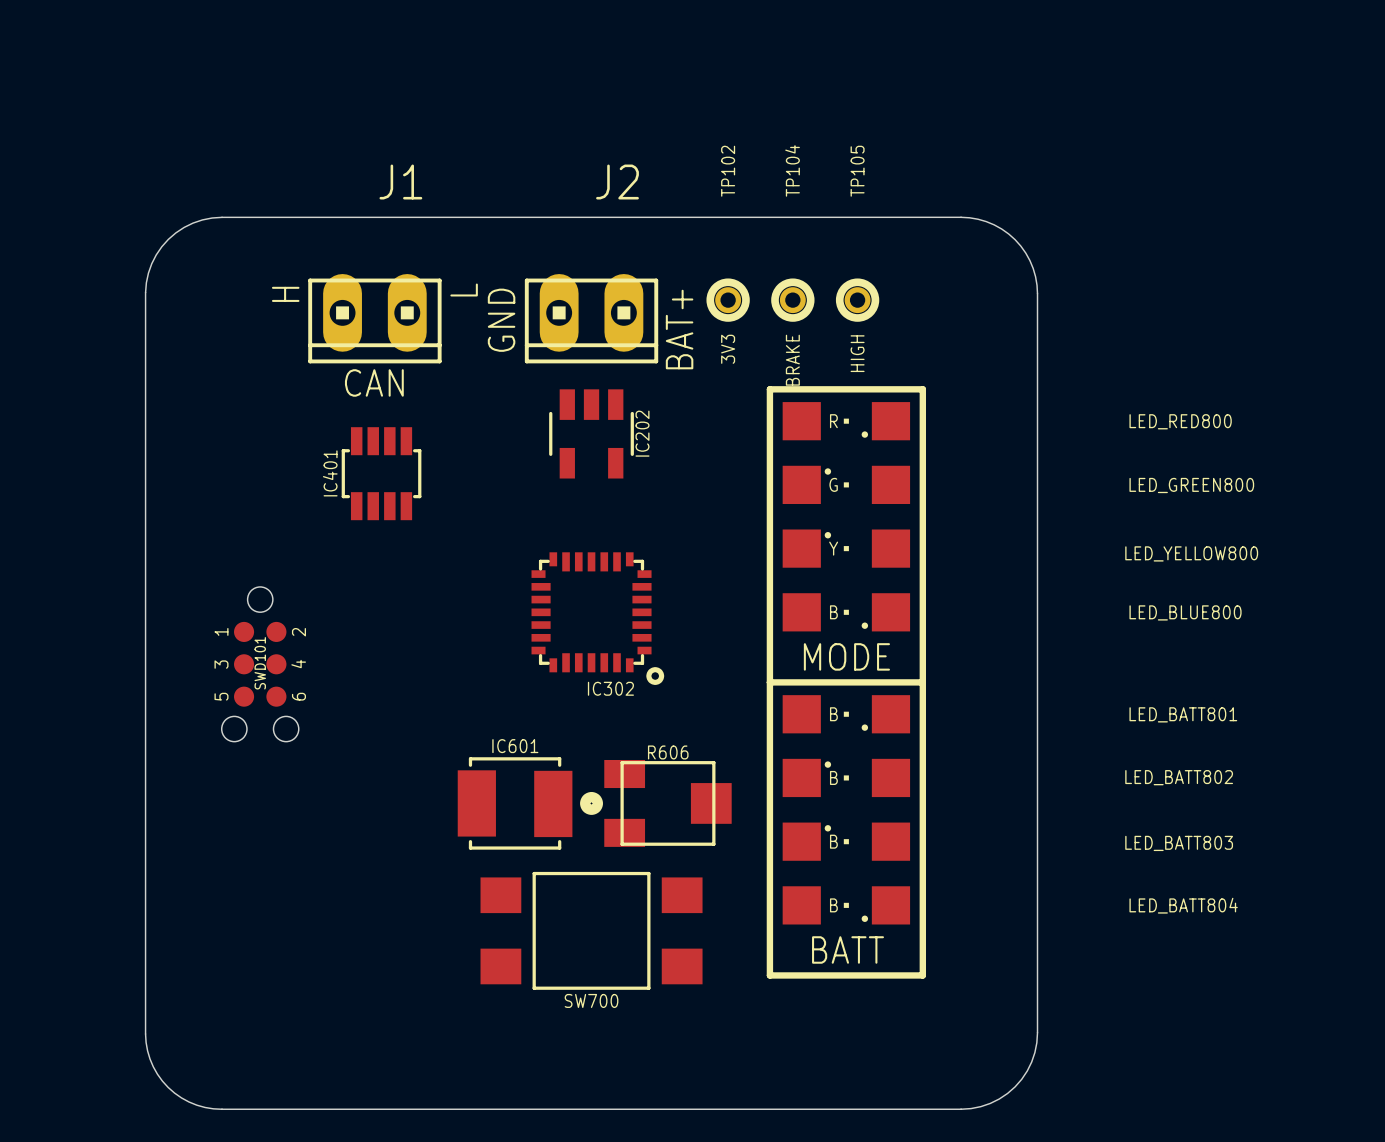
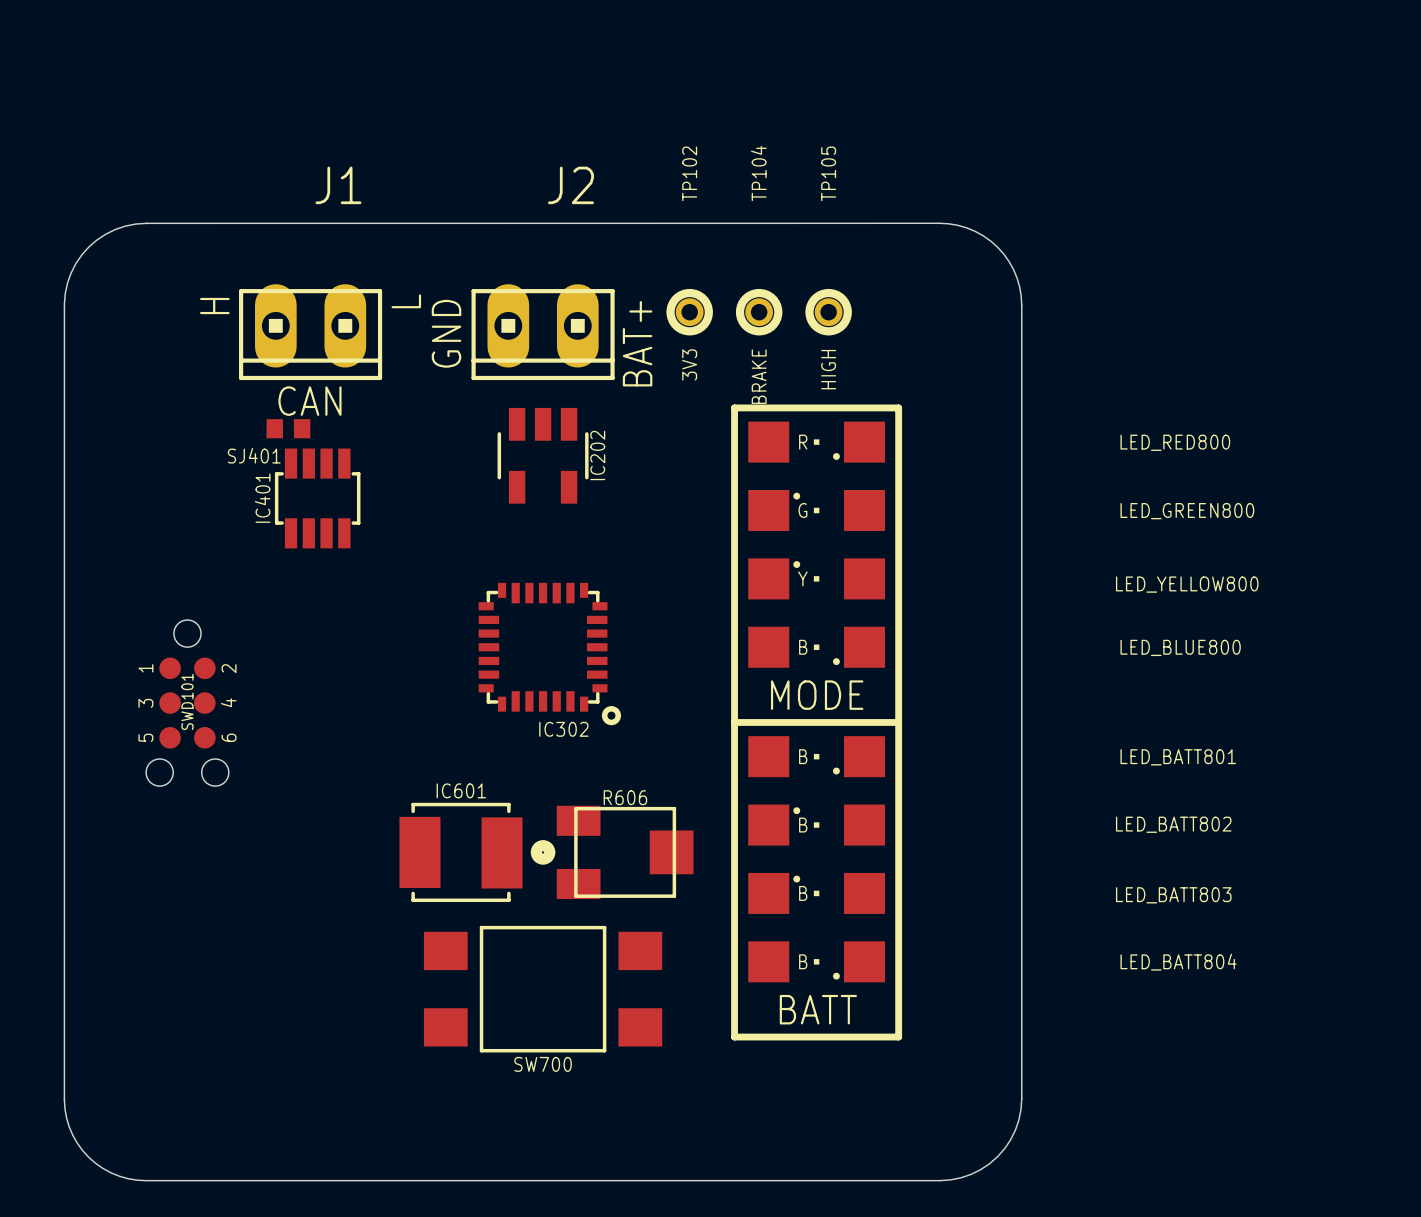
SJ401: none -> (288, 428)

